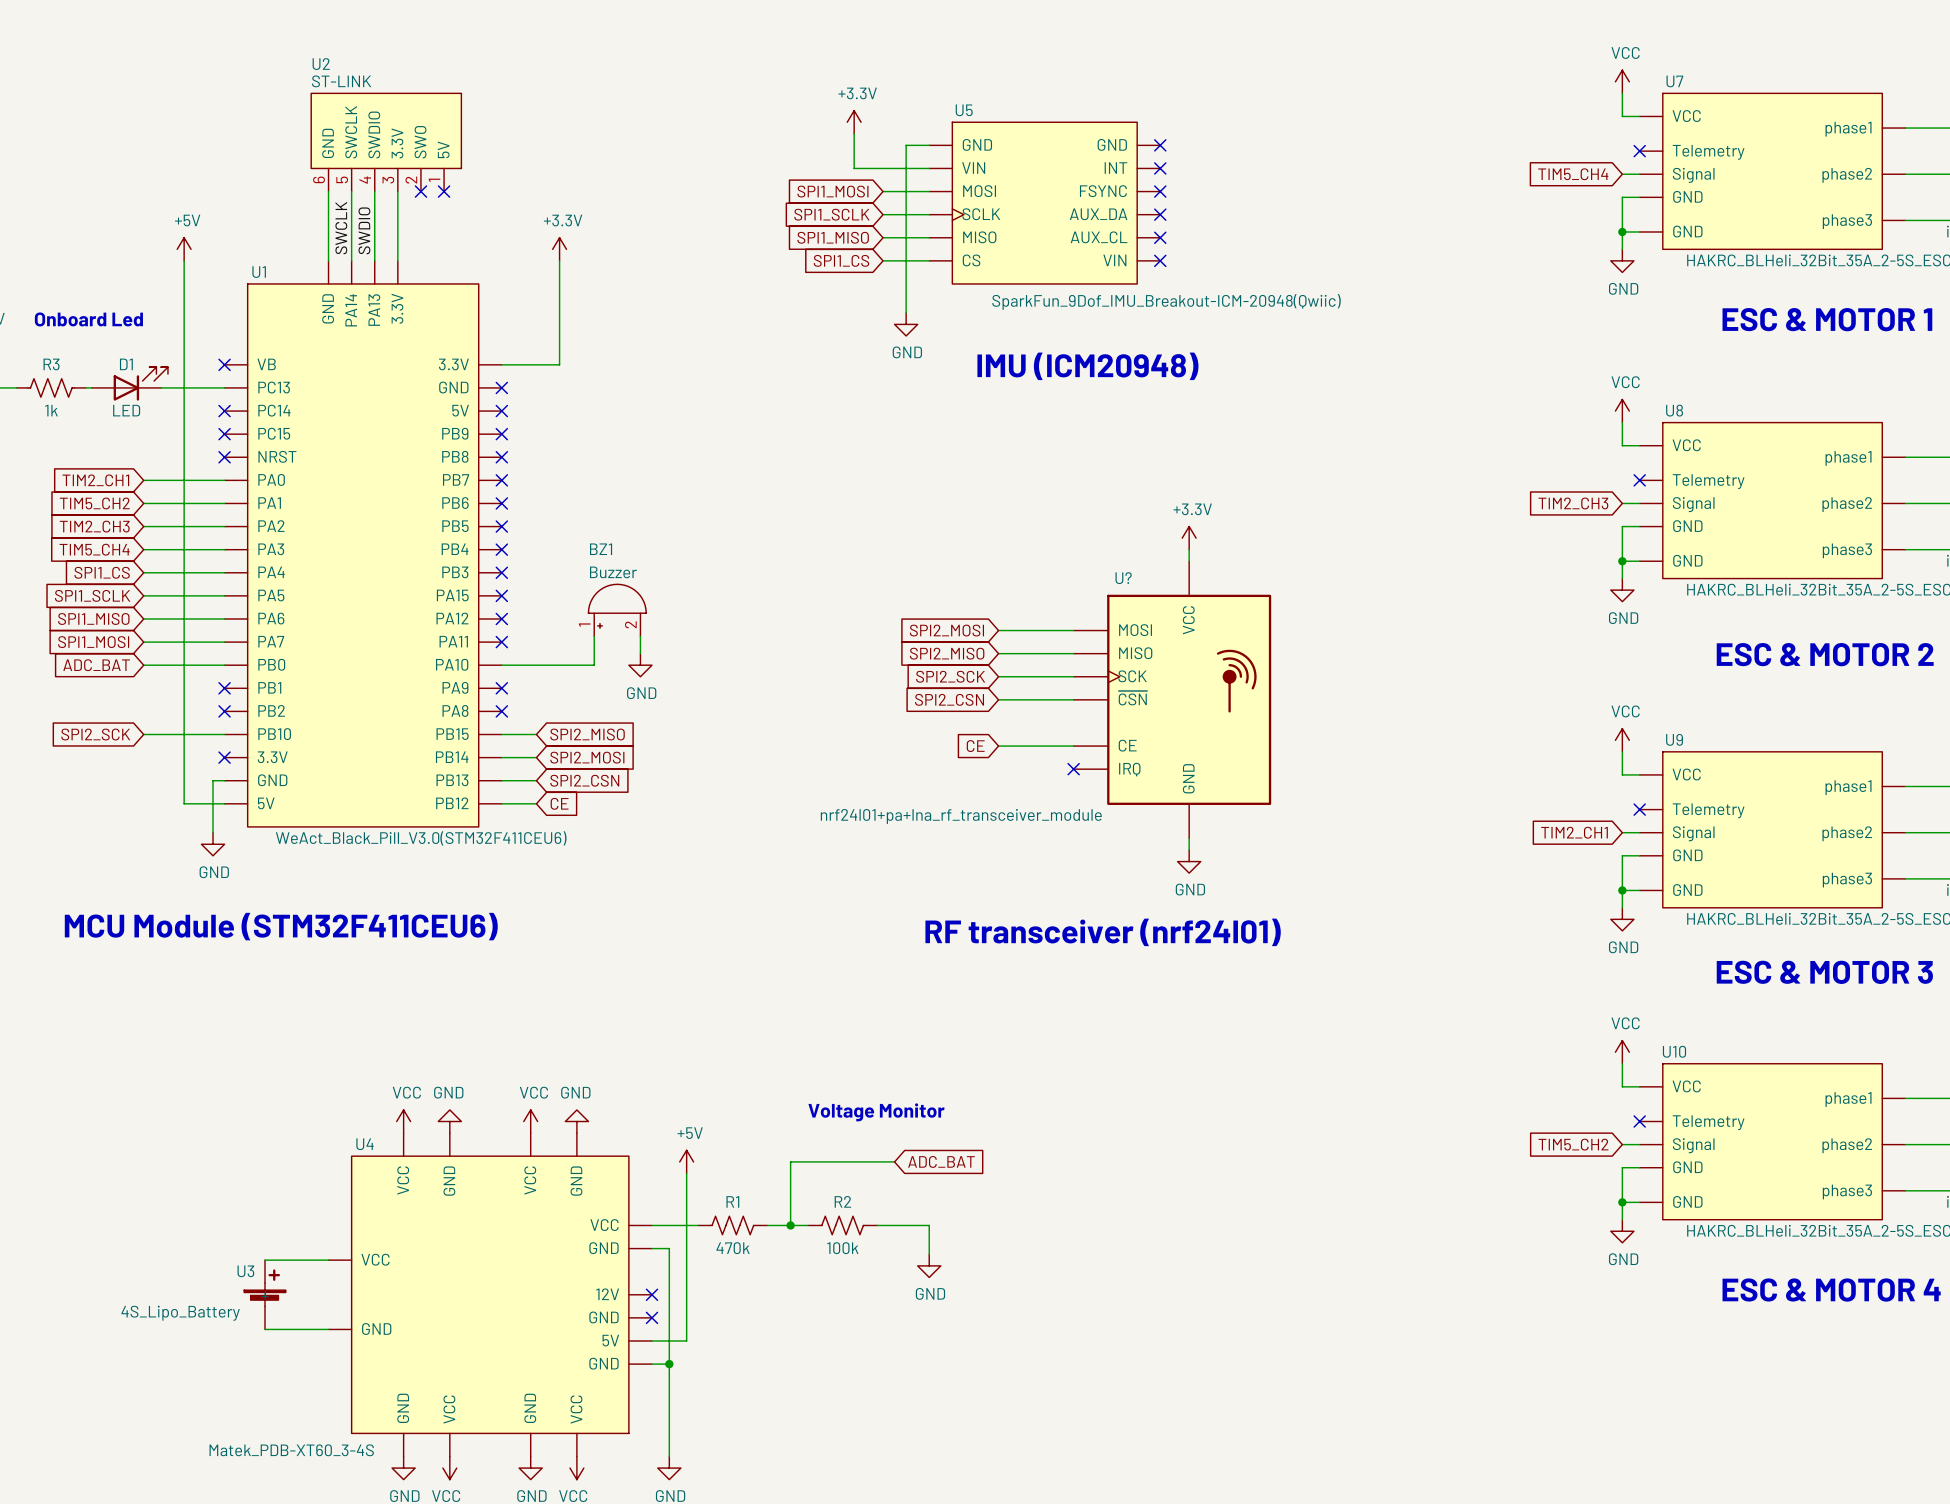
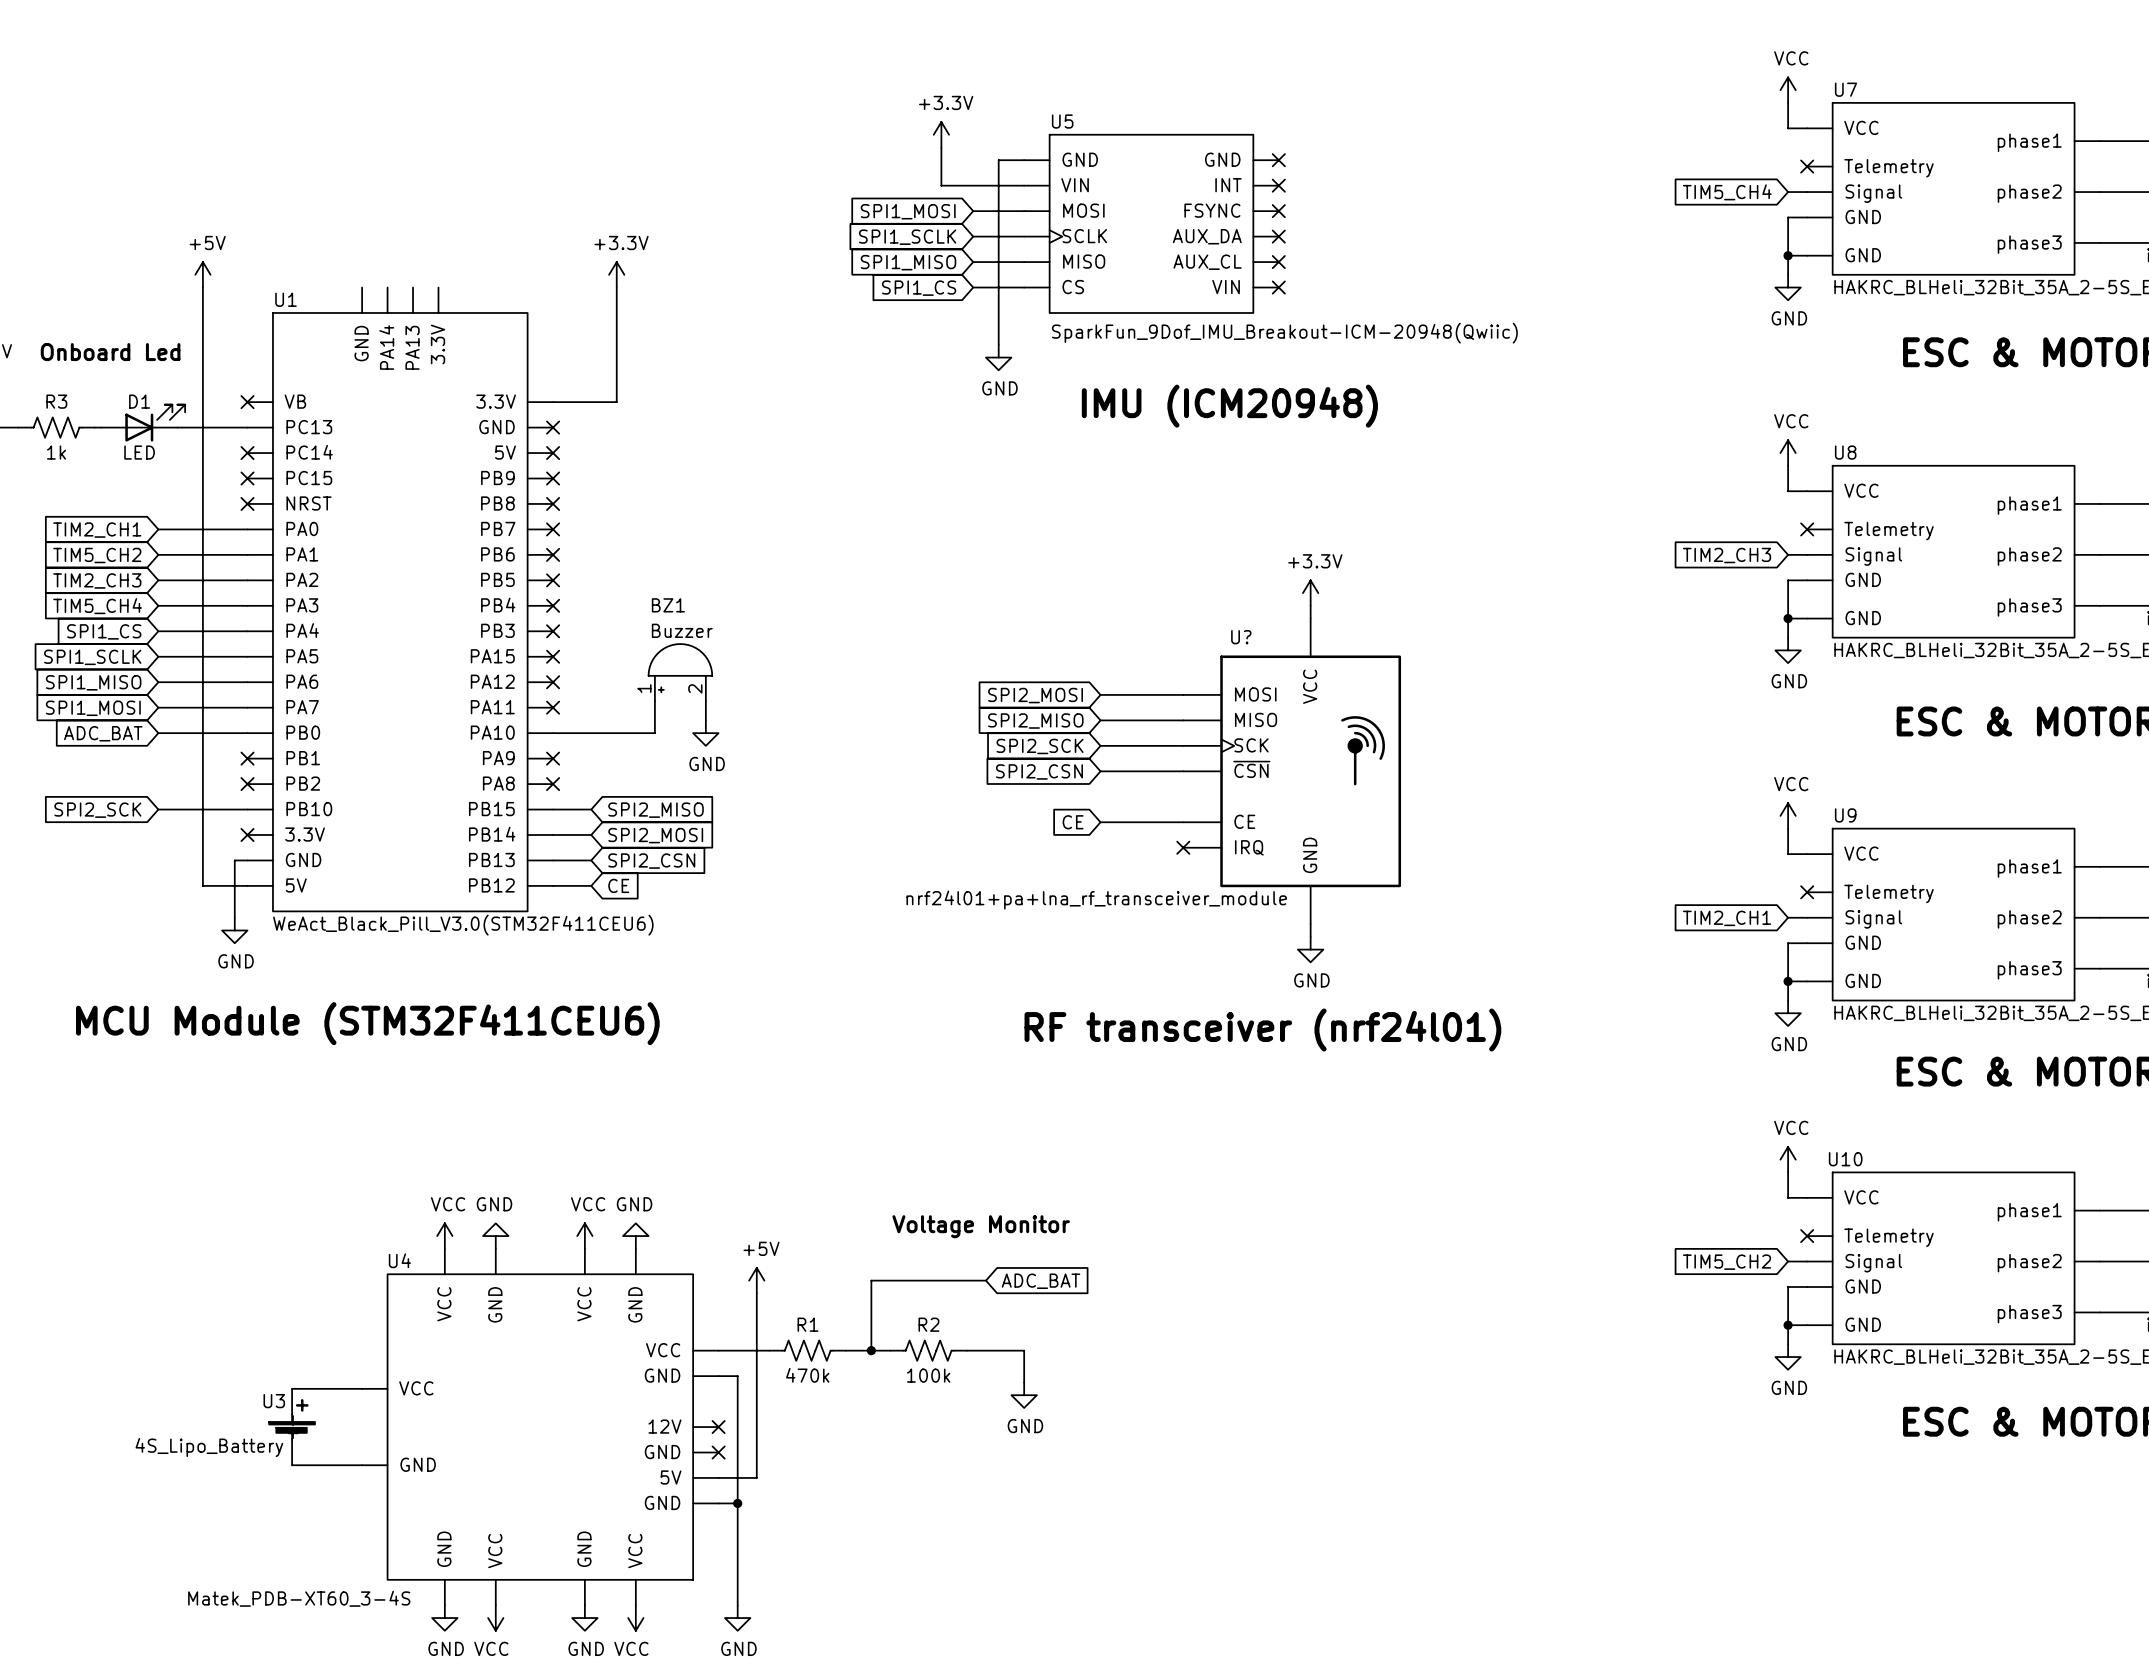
U2: ST-LINK (386, 142) -> none
wire: (328, 191) (328, 260) -> none
wire: (351, 191) (351, 260) -> none
wire: (374, 191) (374, 260) -> none
wire: (397, 191) (397, 260) -> none
no-connect mark: (420, 191) -> none
no-connect mark: (444, 191) -> none
label: SWCLK (341, 228) -> none
label: SWDIO (364, 230) -> none

